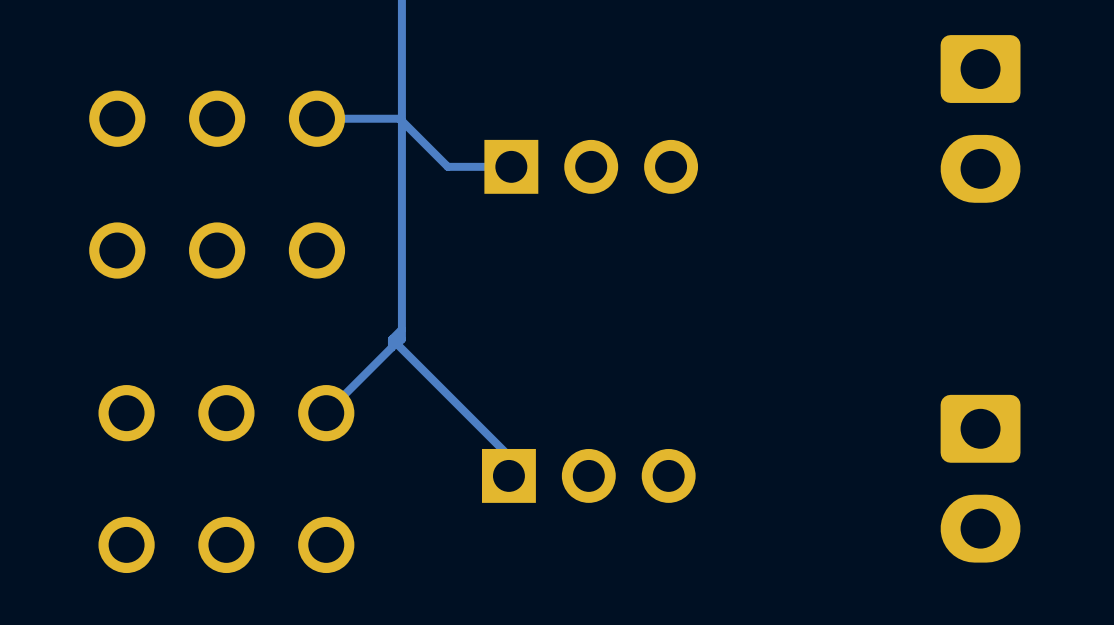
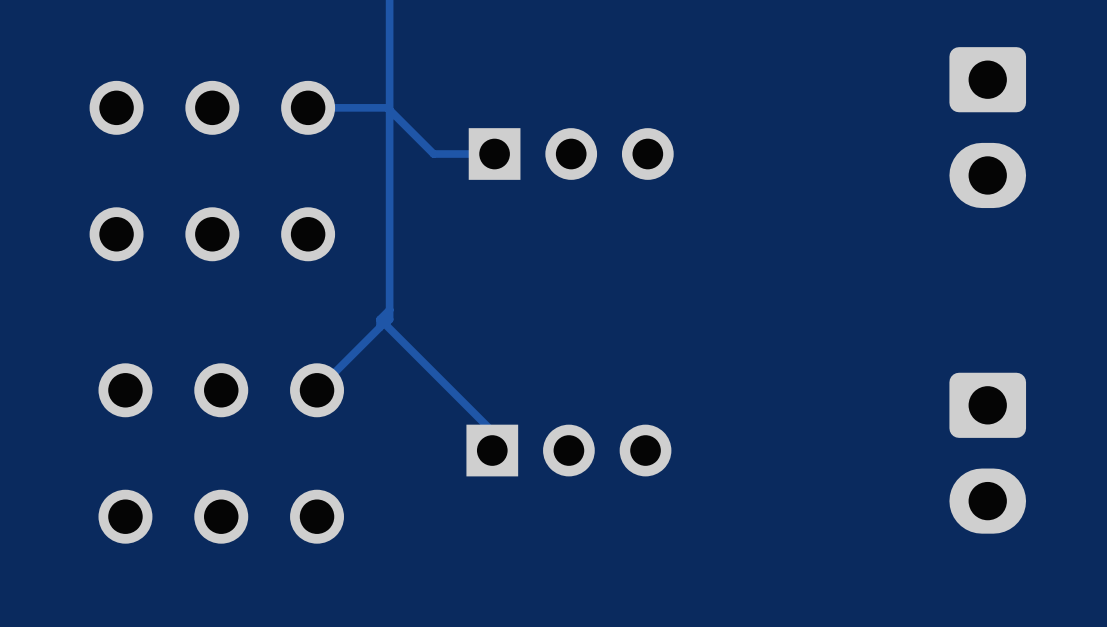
part position: (980, 118) -> (987, 127)
part position: (980, 478) -> (987, 453)

